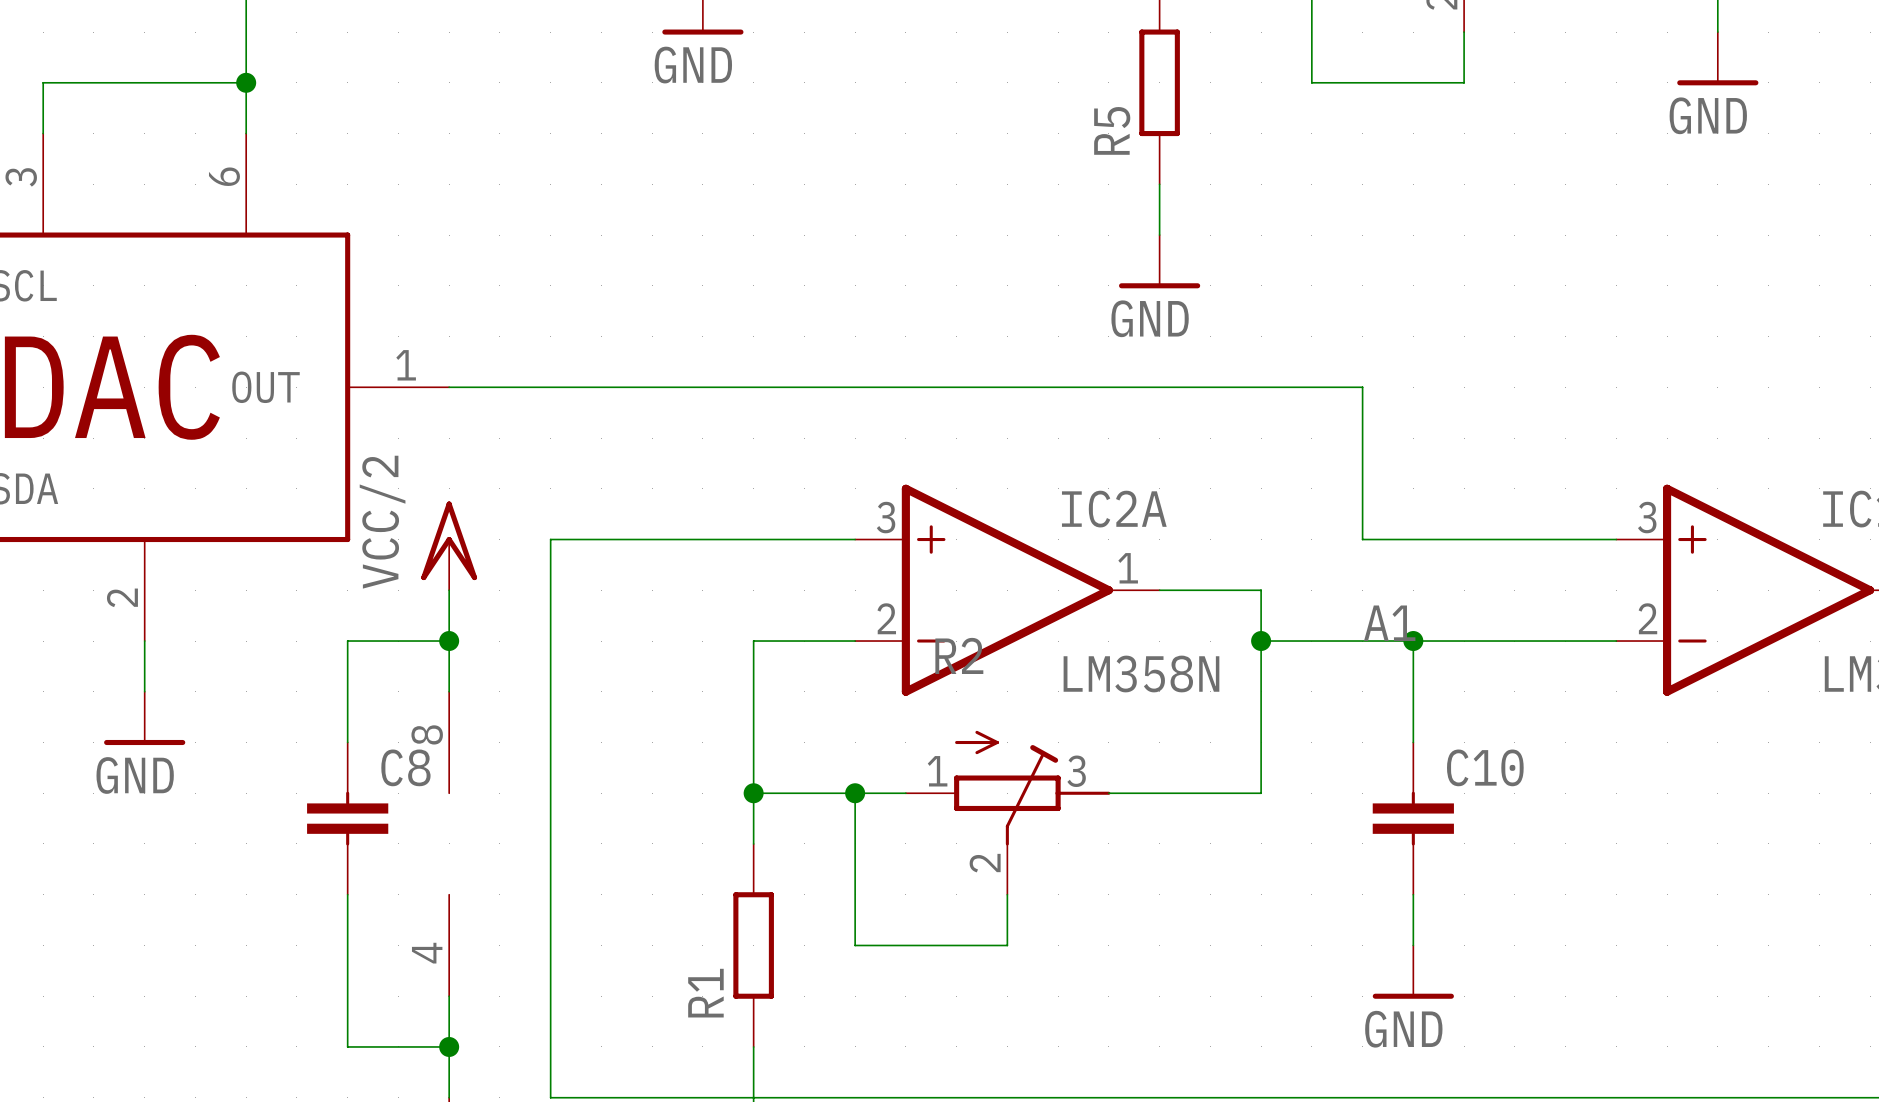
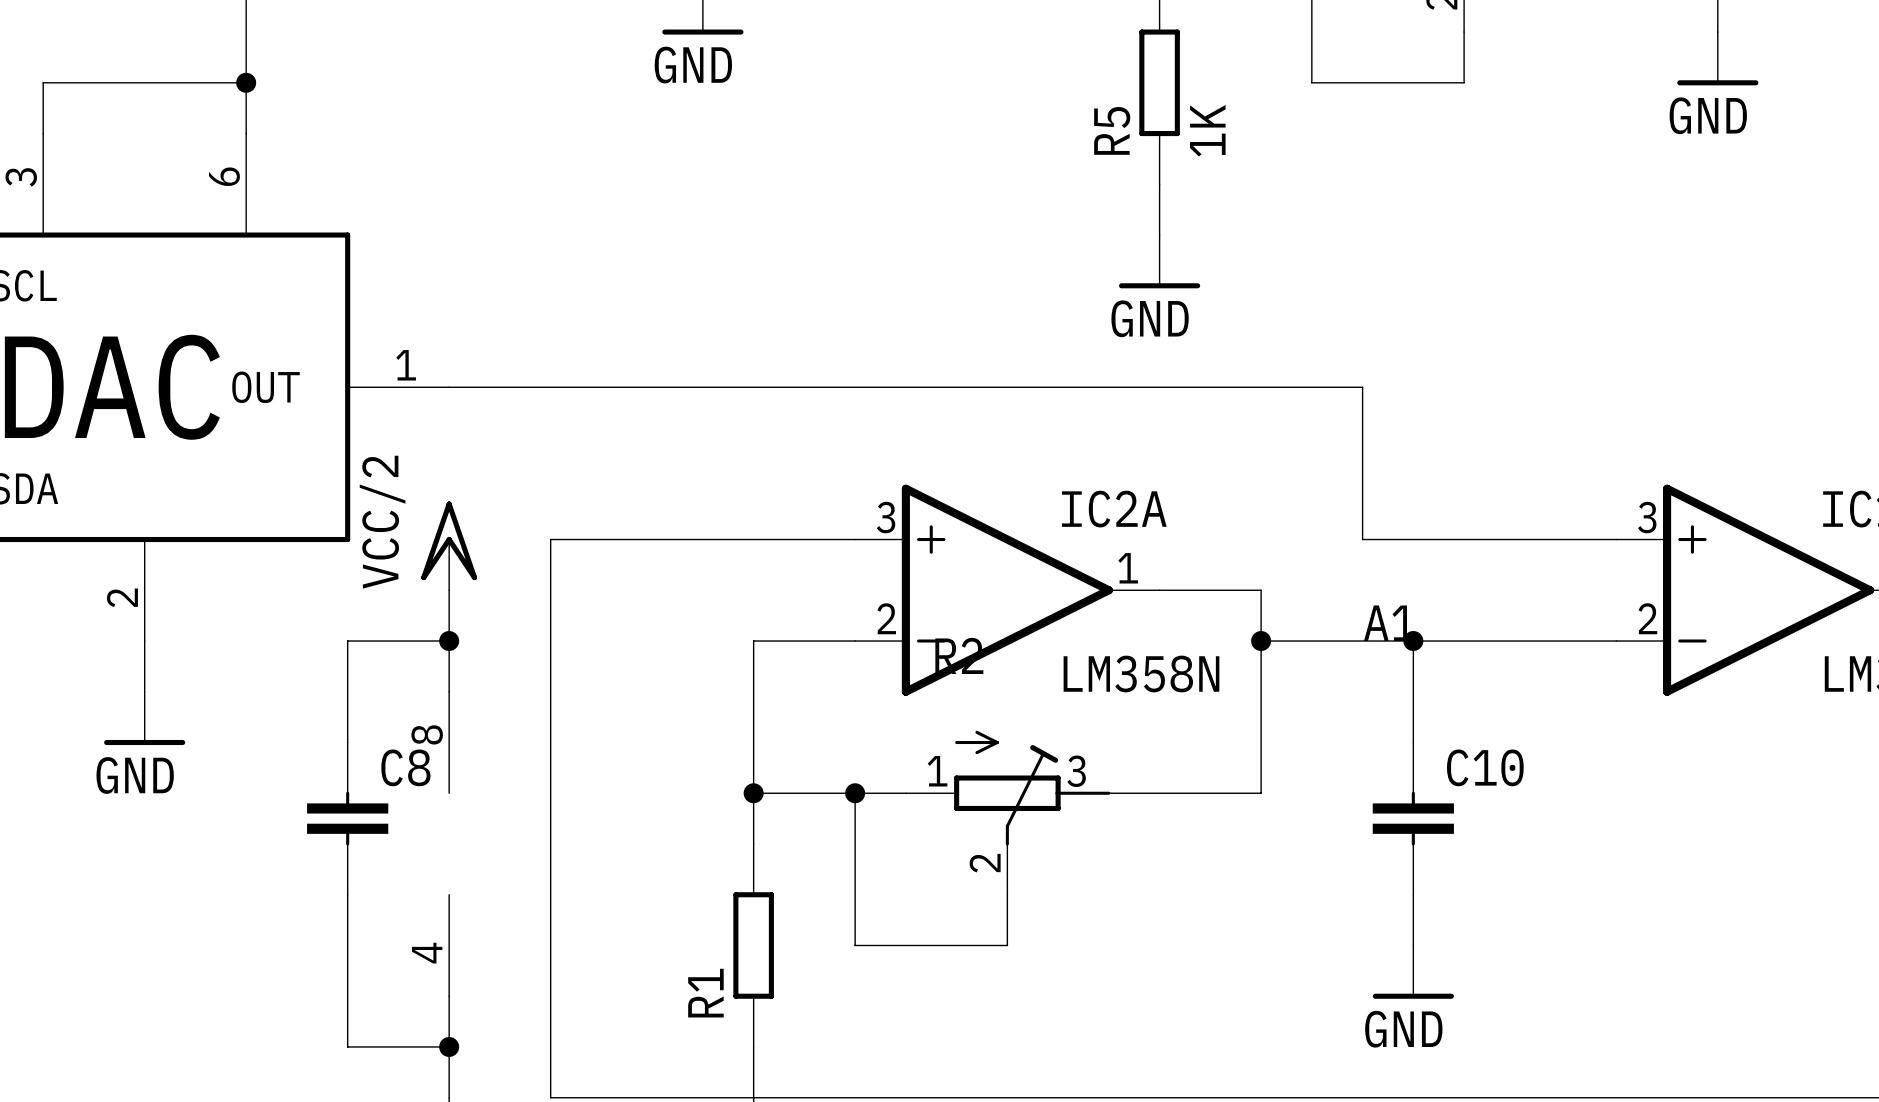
R5 value: none -> 1K (1207, 130)

